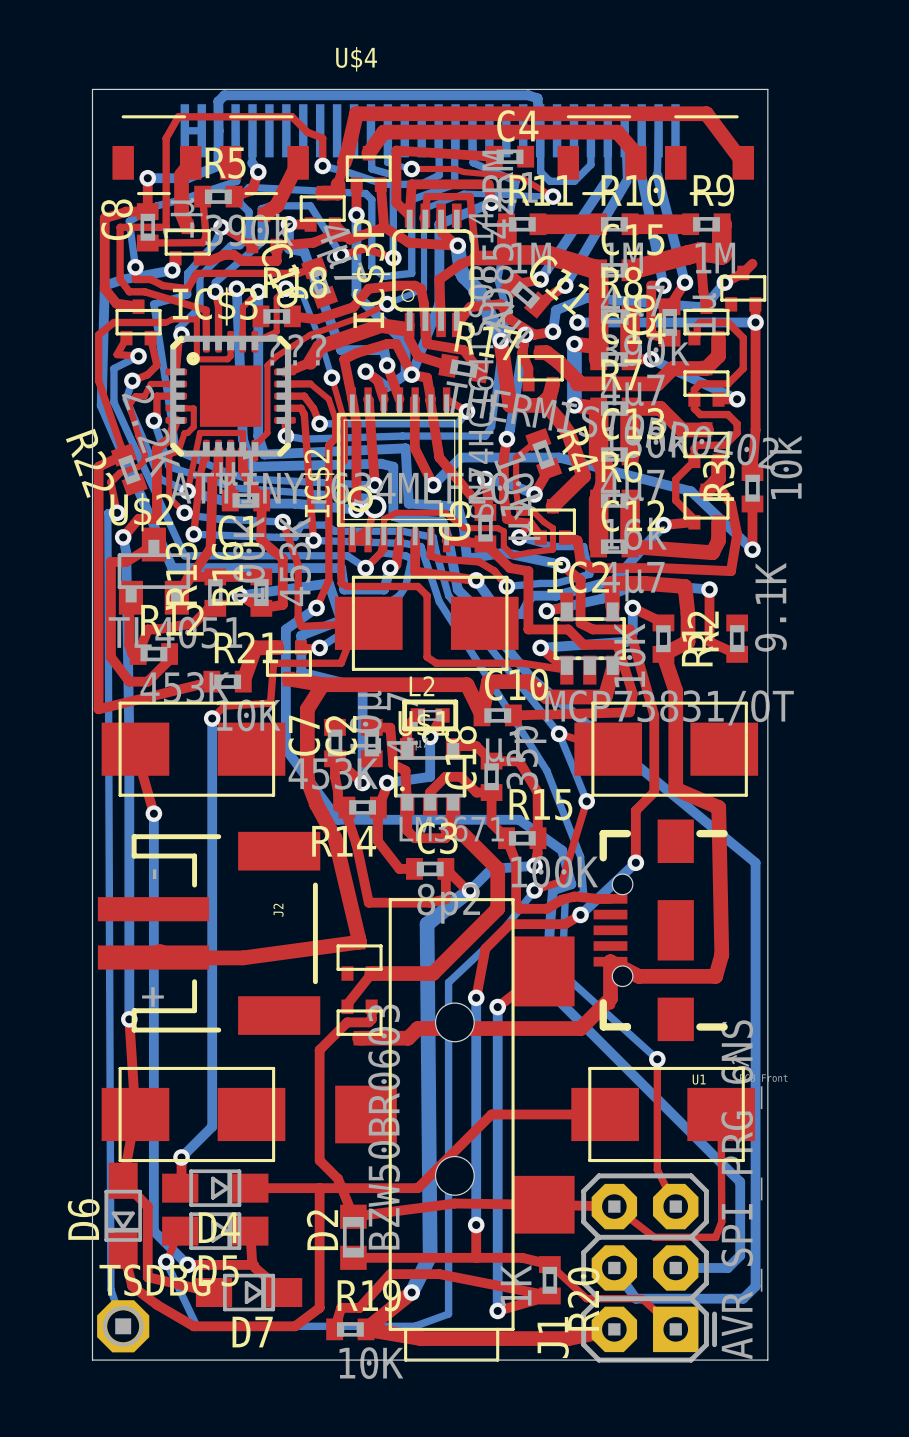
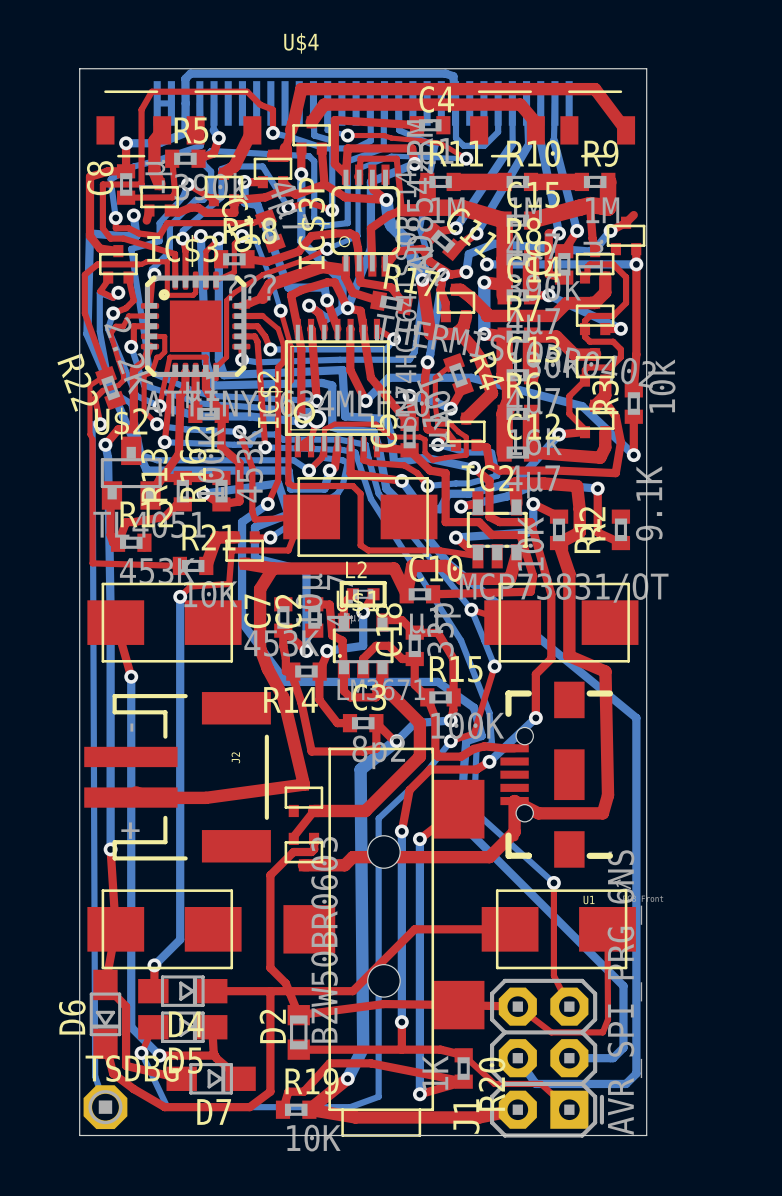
bottom track: (172, 270) (123, 279) (104, 285) -> (133, 215) (136, 236) (90, 233)
via position: (172, 270) -> (133, 215)
top track: (126, 338) (117, 354) (138, 356) -> none
top track: none -> (108, 280) (100, 291) (113, 297)
bottom track: (138, 356) (113, 368) (113, 402) (184, 555) -> (113, 297) (99, 292) (99, 331) (110, 390) (131, 403) (141, 455) (157, 460)
top track: (98, 380) (123, 455) (98, 466) (98, 709) (211, 681) -> (84, 313) (107, 374) (90, 385) (90, 434) (92, 439) (92, 563) (179, 565)
top track: (155, 543) (126, 561) (110, 561) (110, 657) (129, 681) (147, 681) (169, 659) -> none

